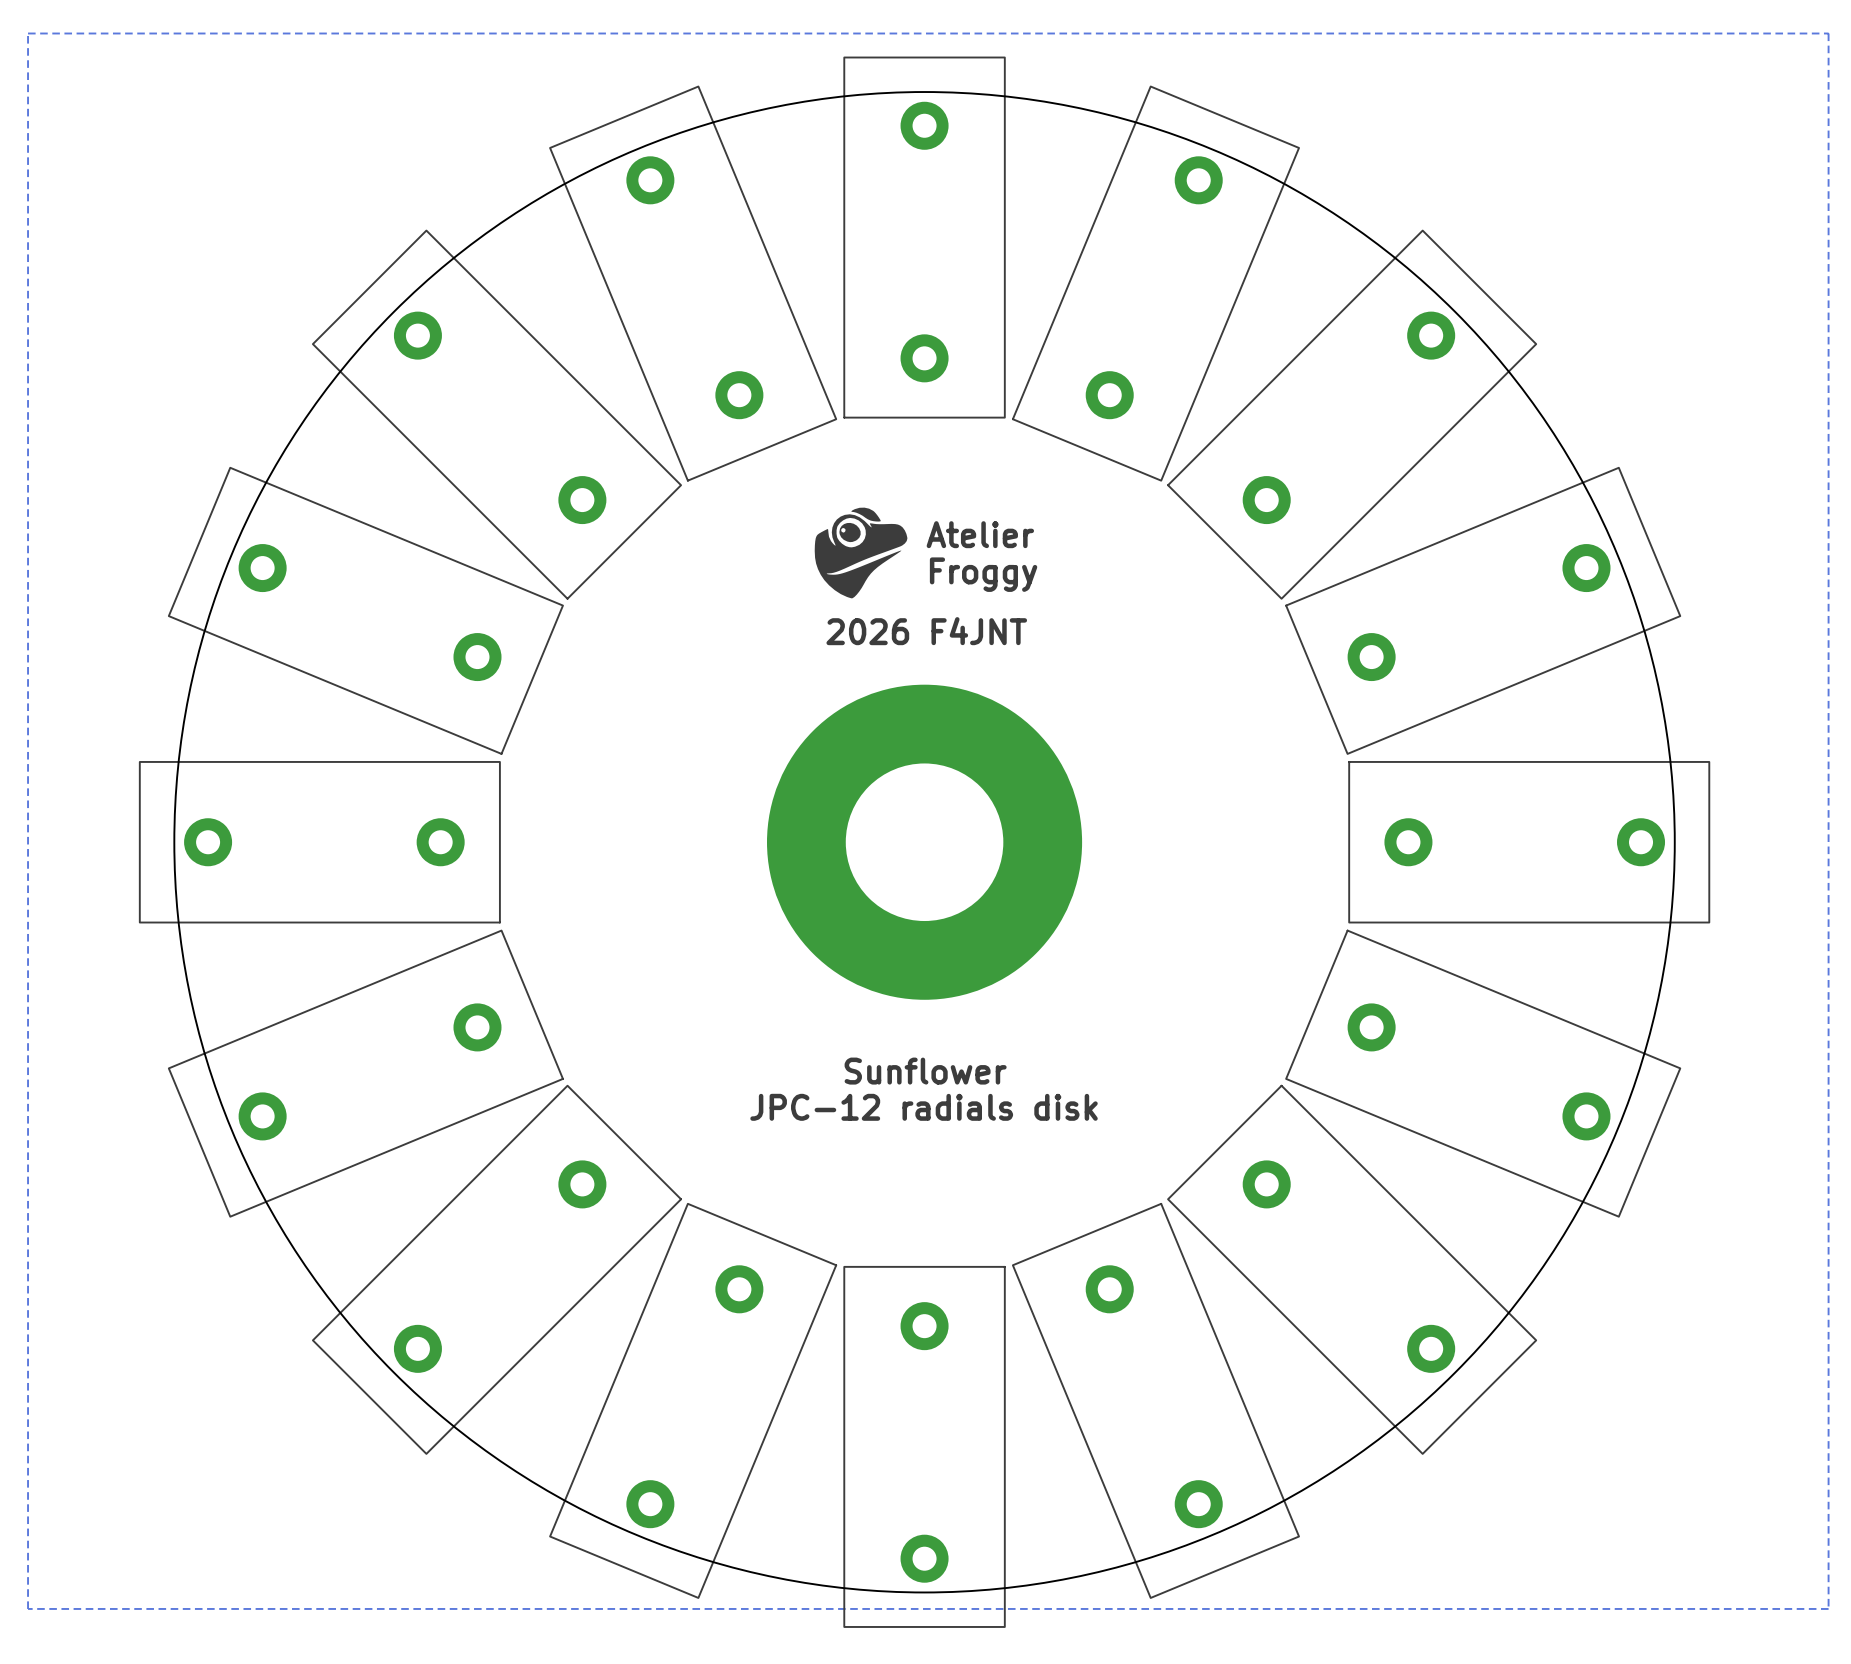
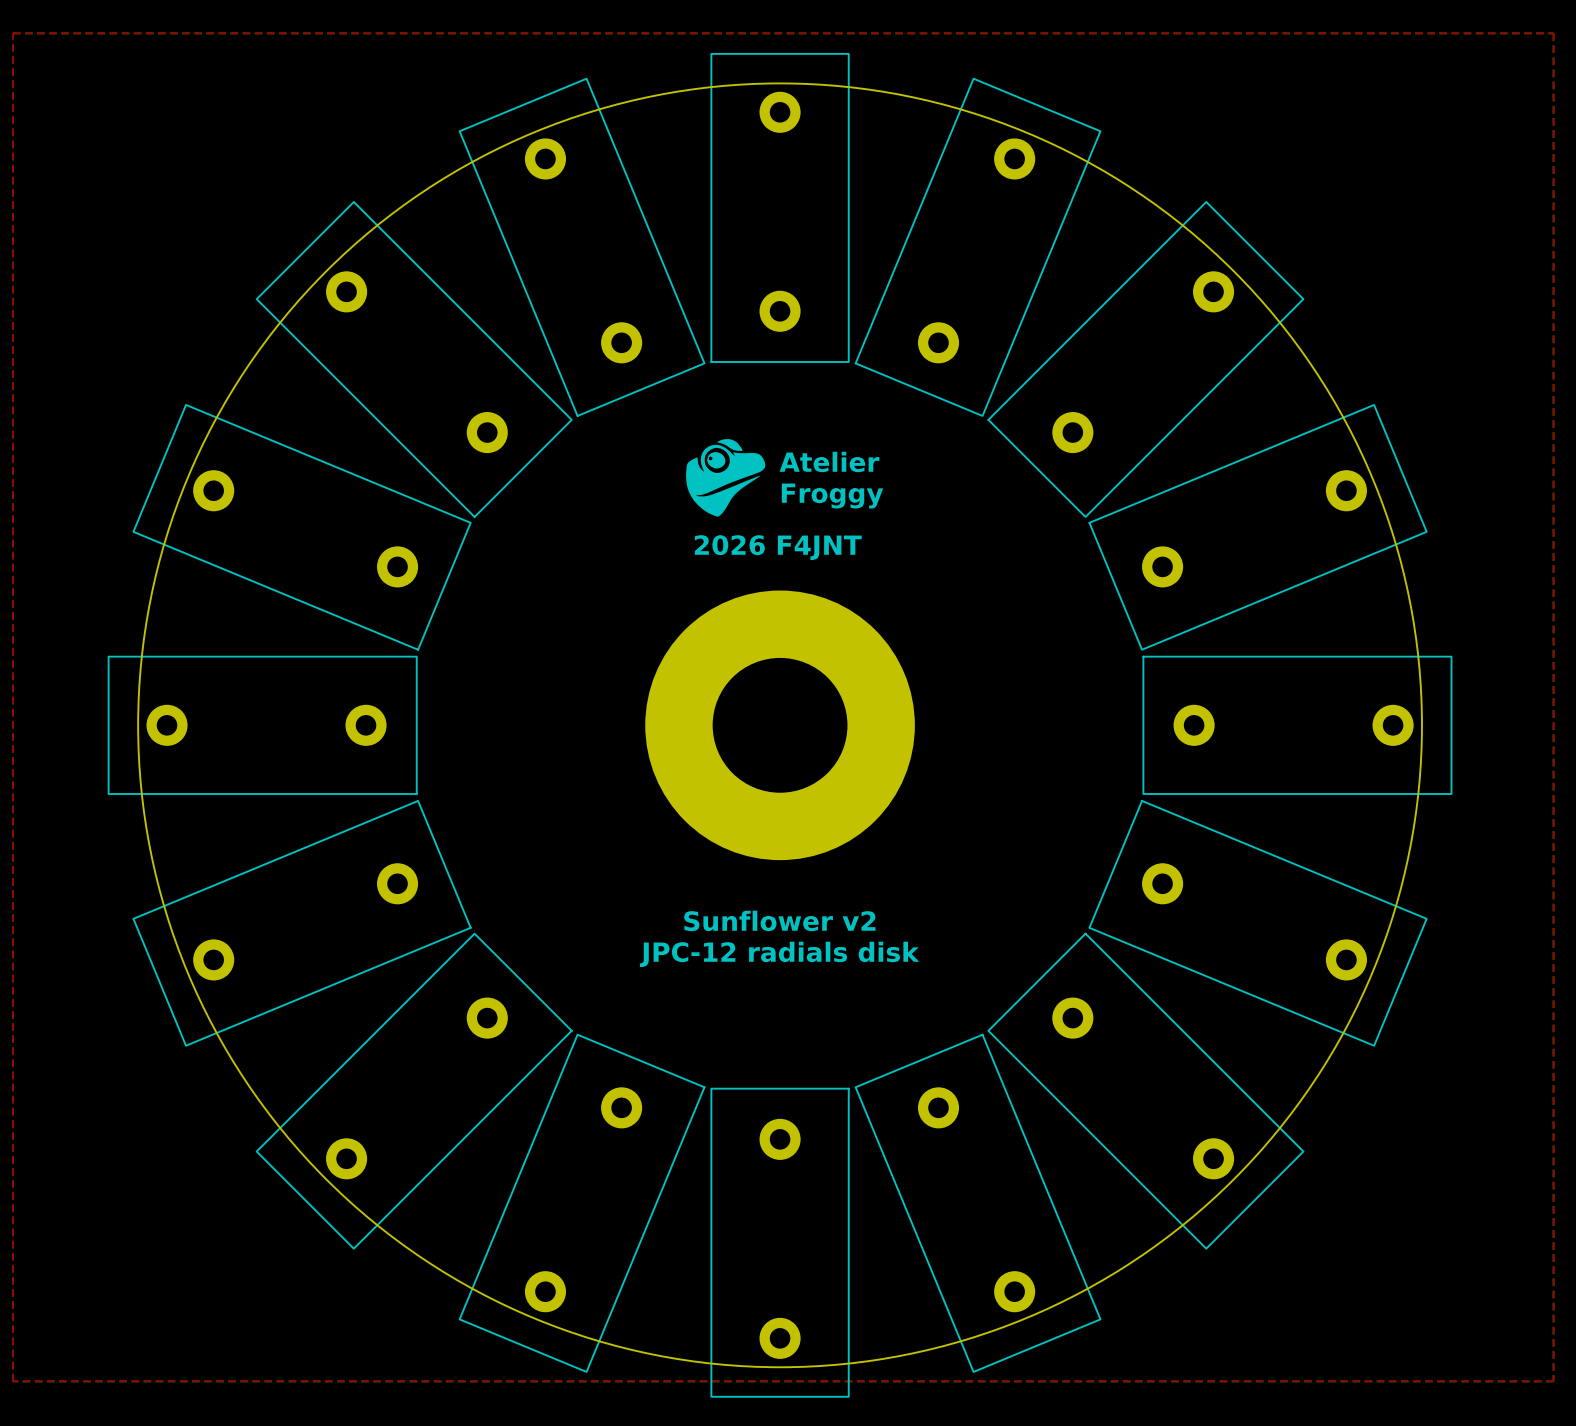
top zone outline: none -> (12, 33) (1553, 33) (1553, 1381) (12, 1381) (12, 33)
text: Sunflower (925, 1071) -> Sunflower v2 (779, 920)

